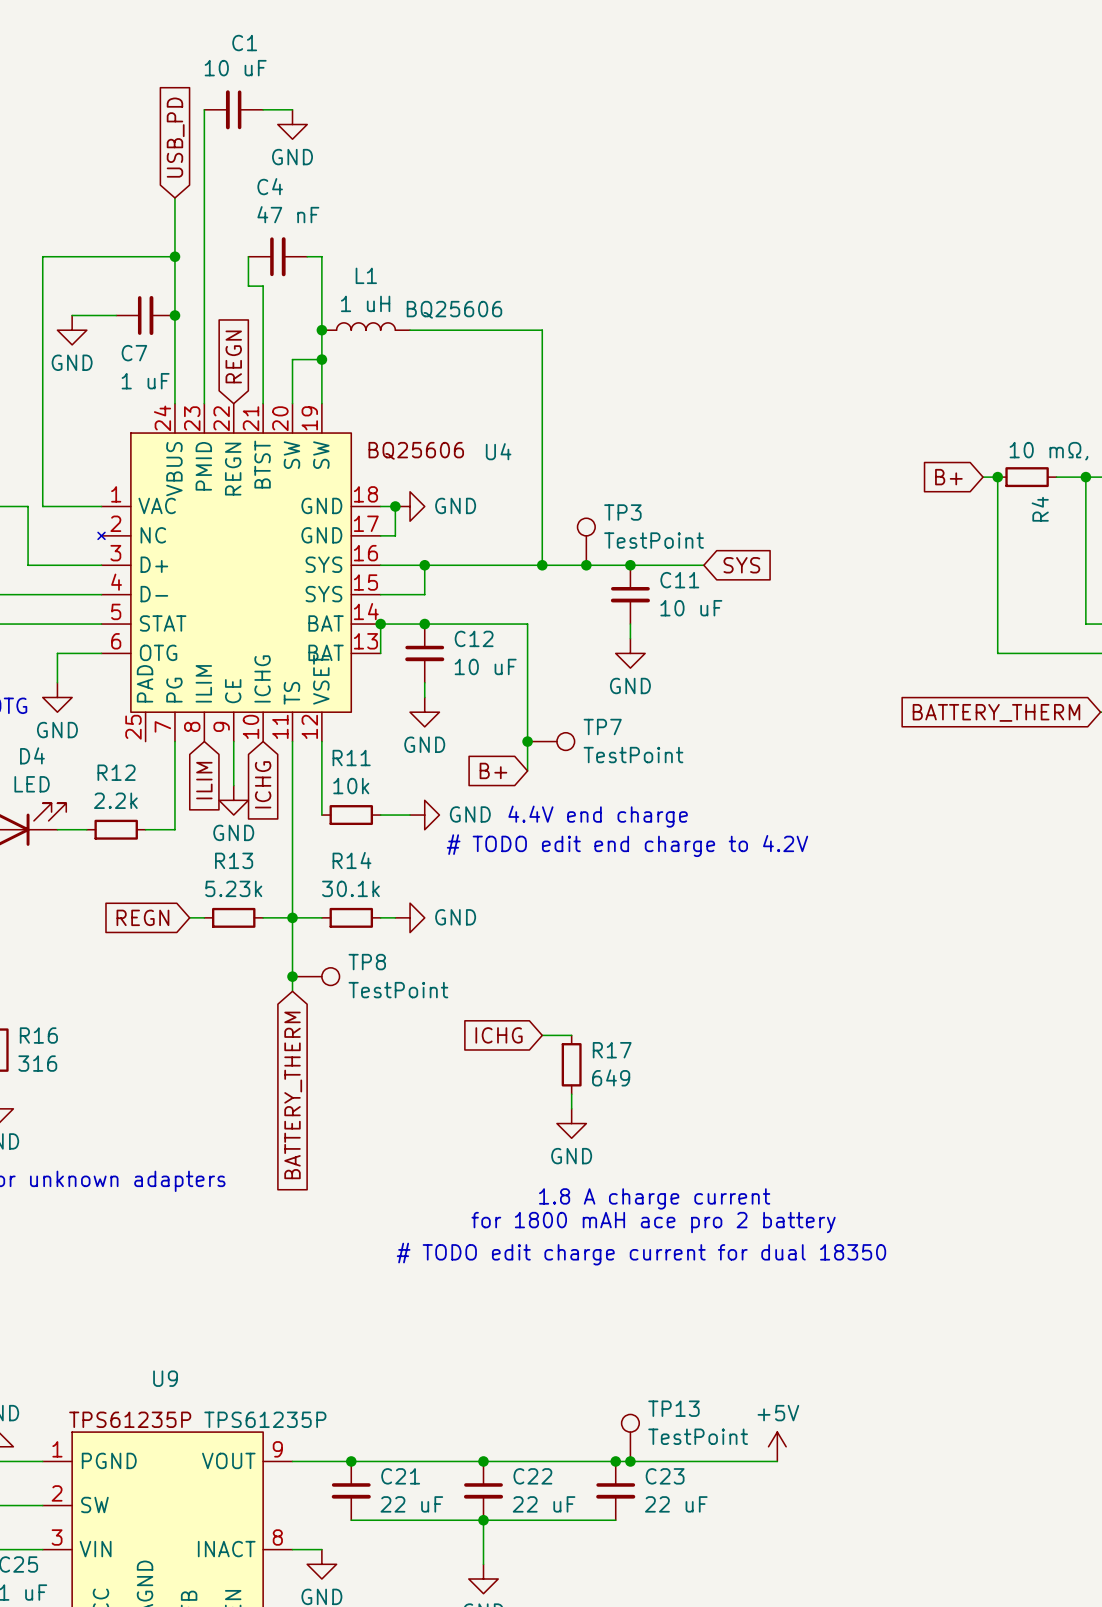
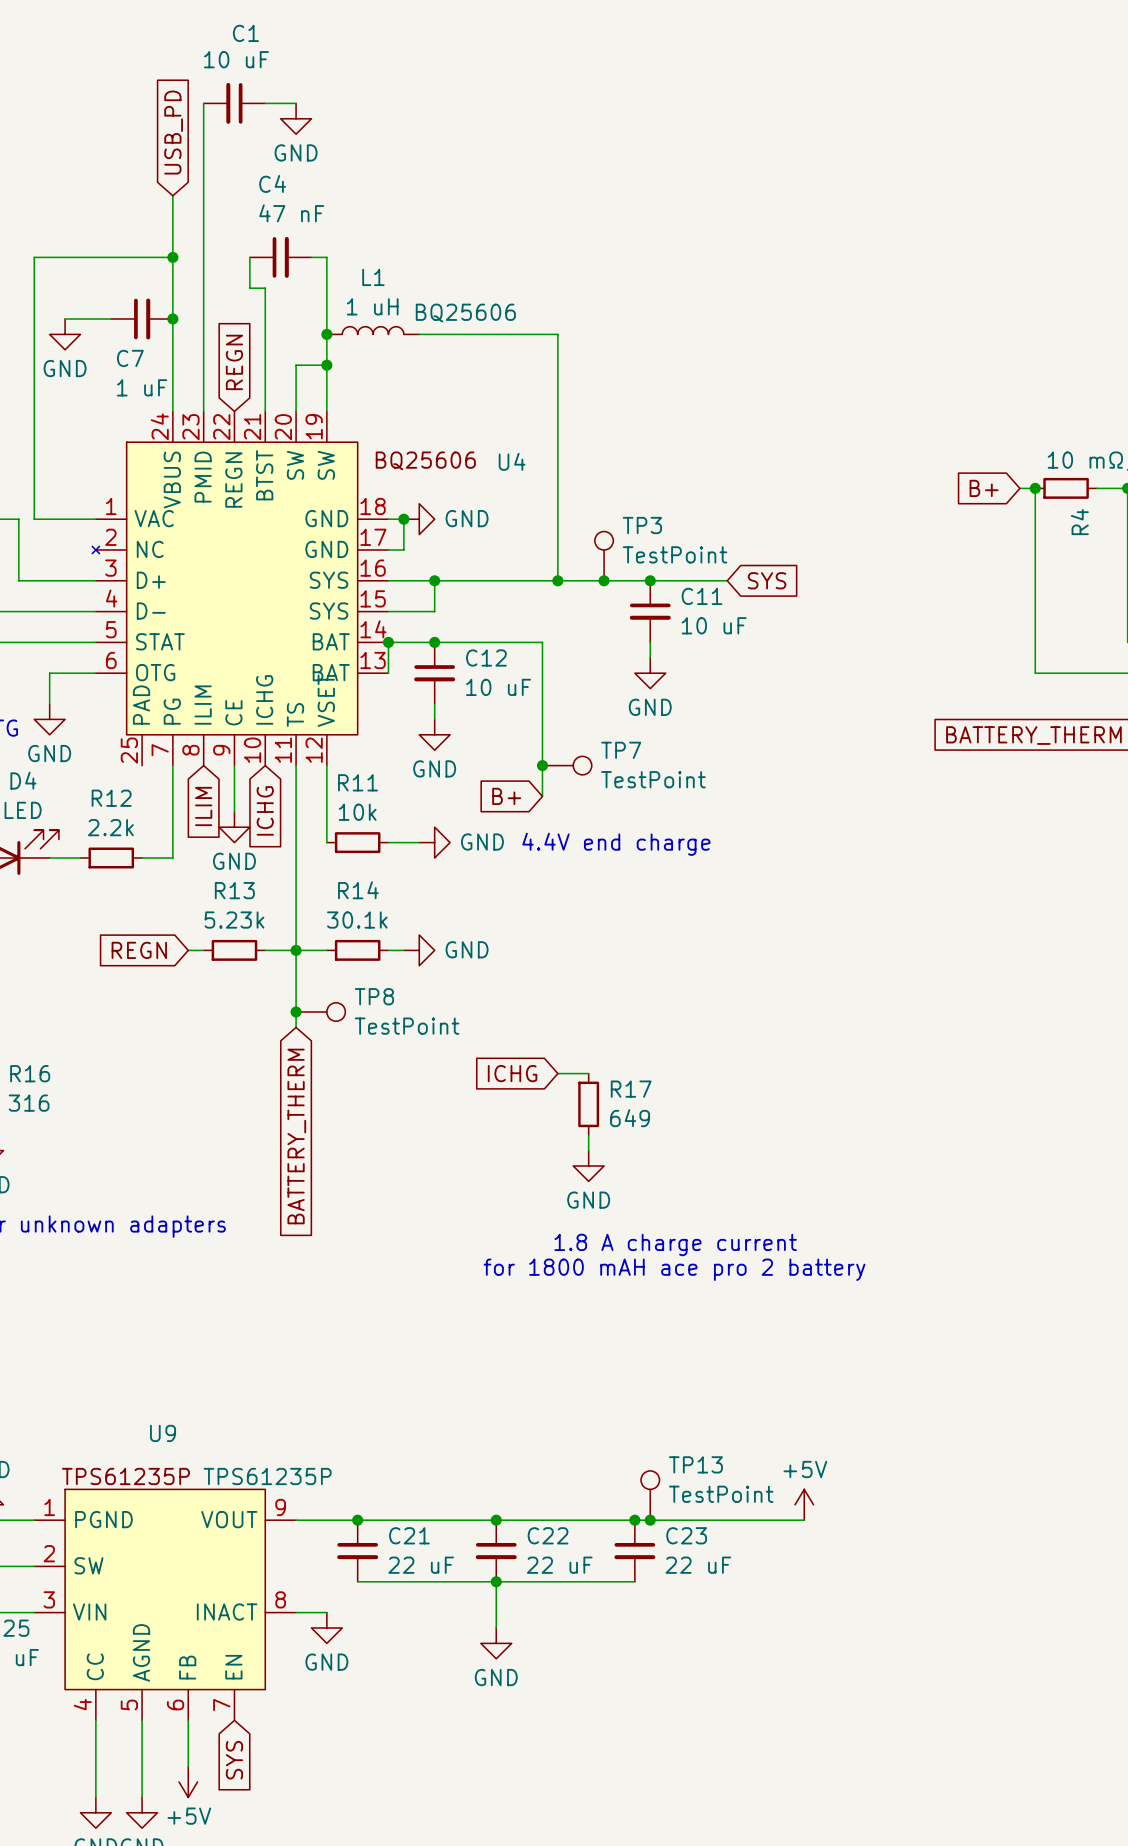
text: # TODO edit end charge to 4.2V (627, 845) -> none
text: # TODO edit charge current for dual 18350 (641, 1254) -> none

